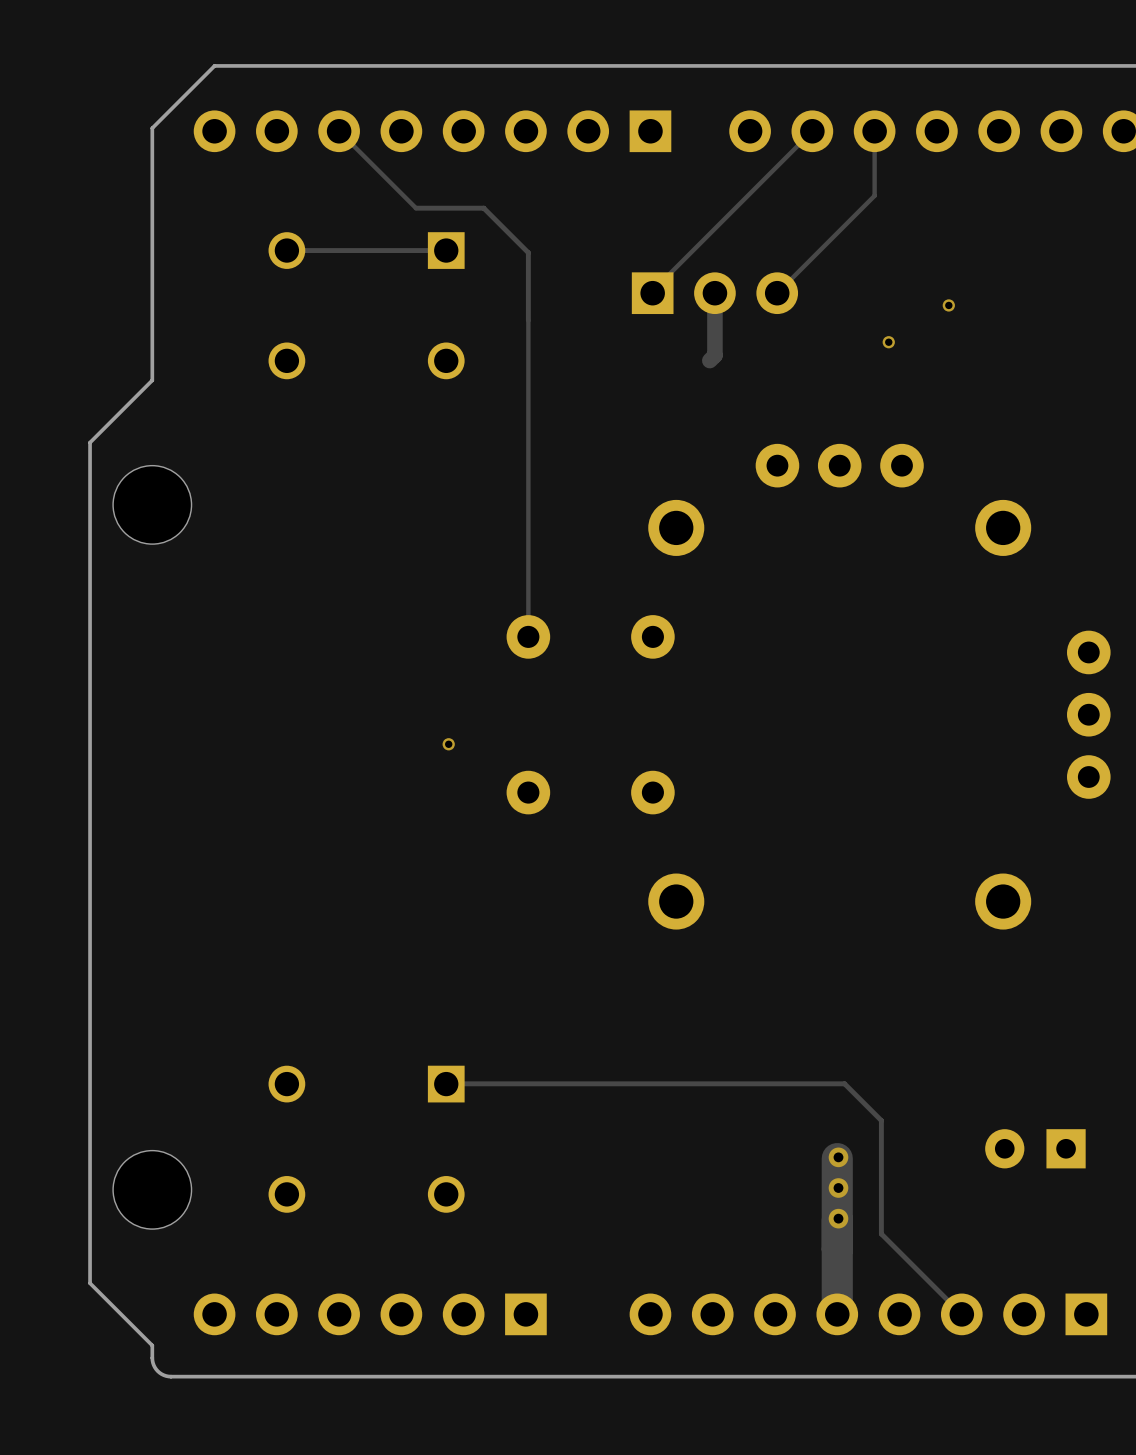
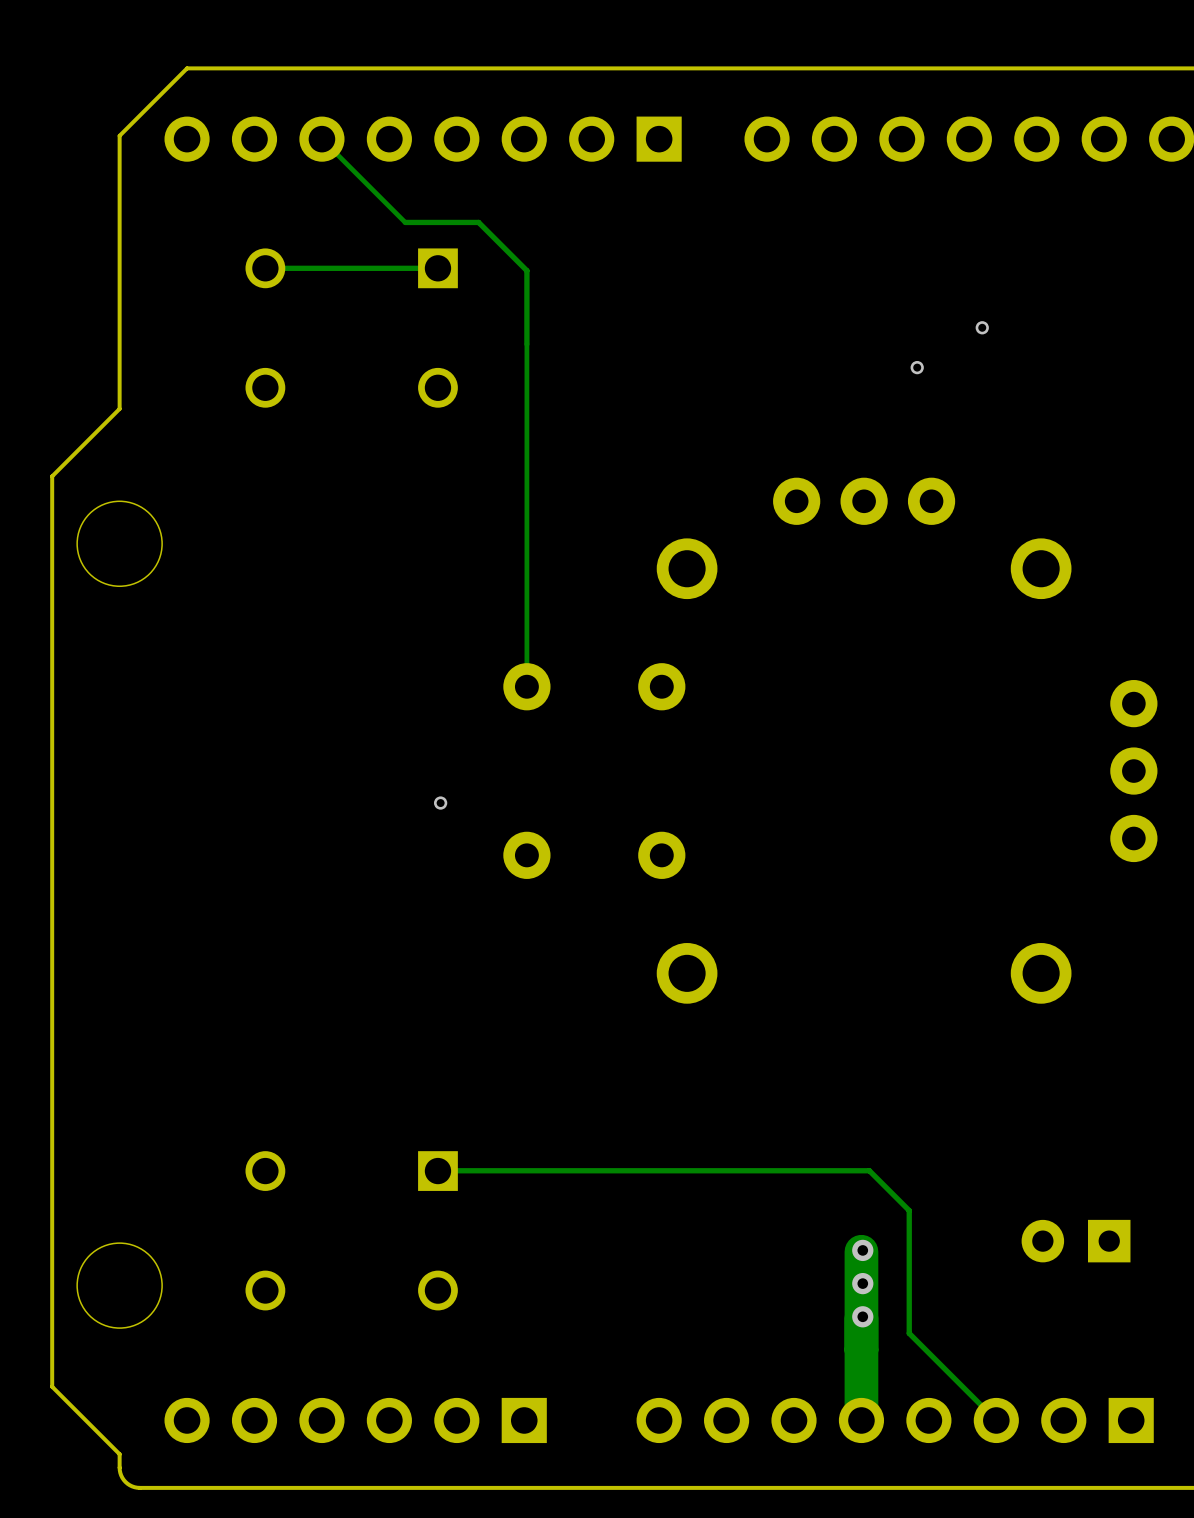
track: (812, 131) (652, 290) (652, 293) -> none
track: (874, 131) (874, 195) (777, 293) -> none
track: (714, 293) (714, 355) (709, 360) -> none
part: (714, 293) -> none

